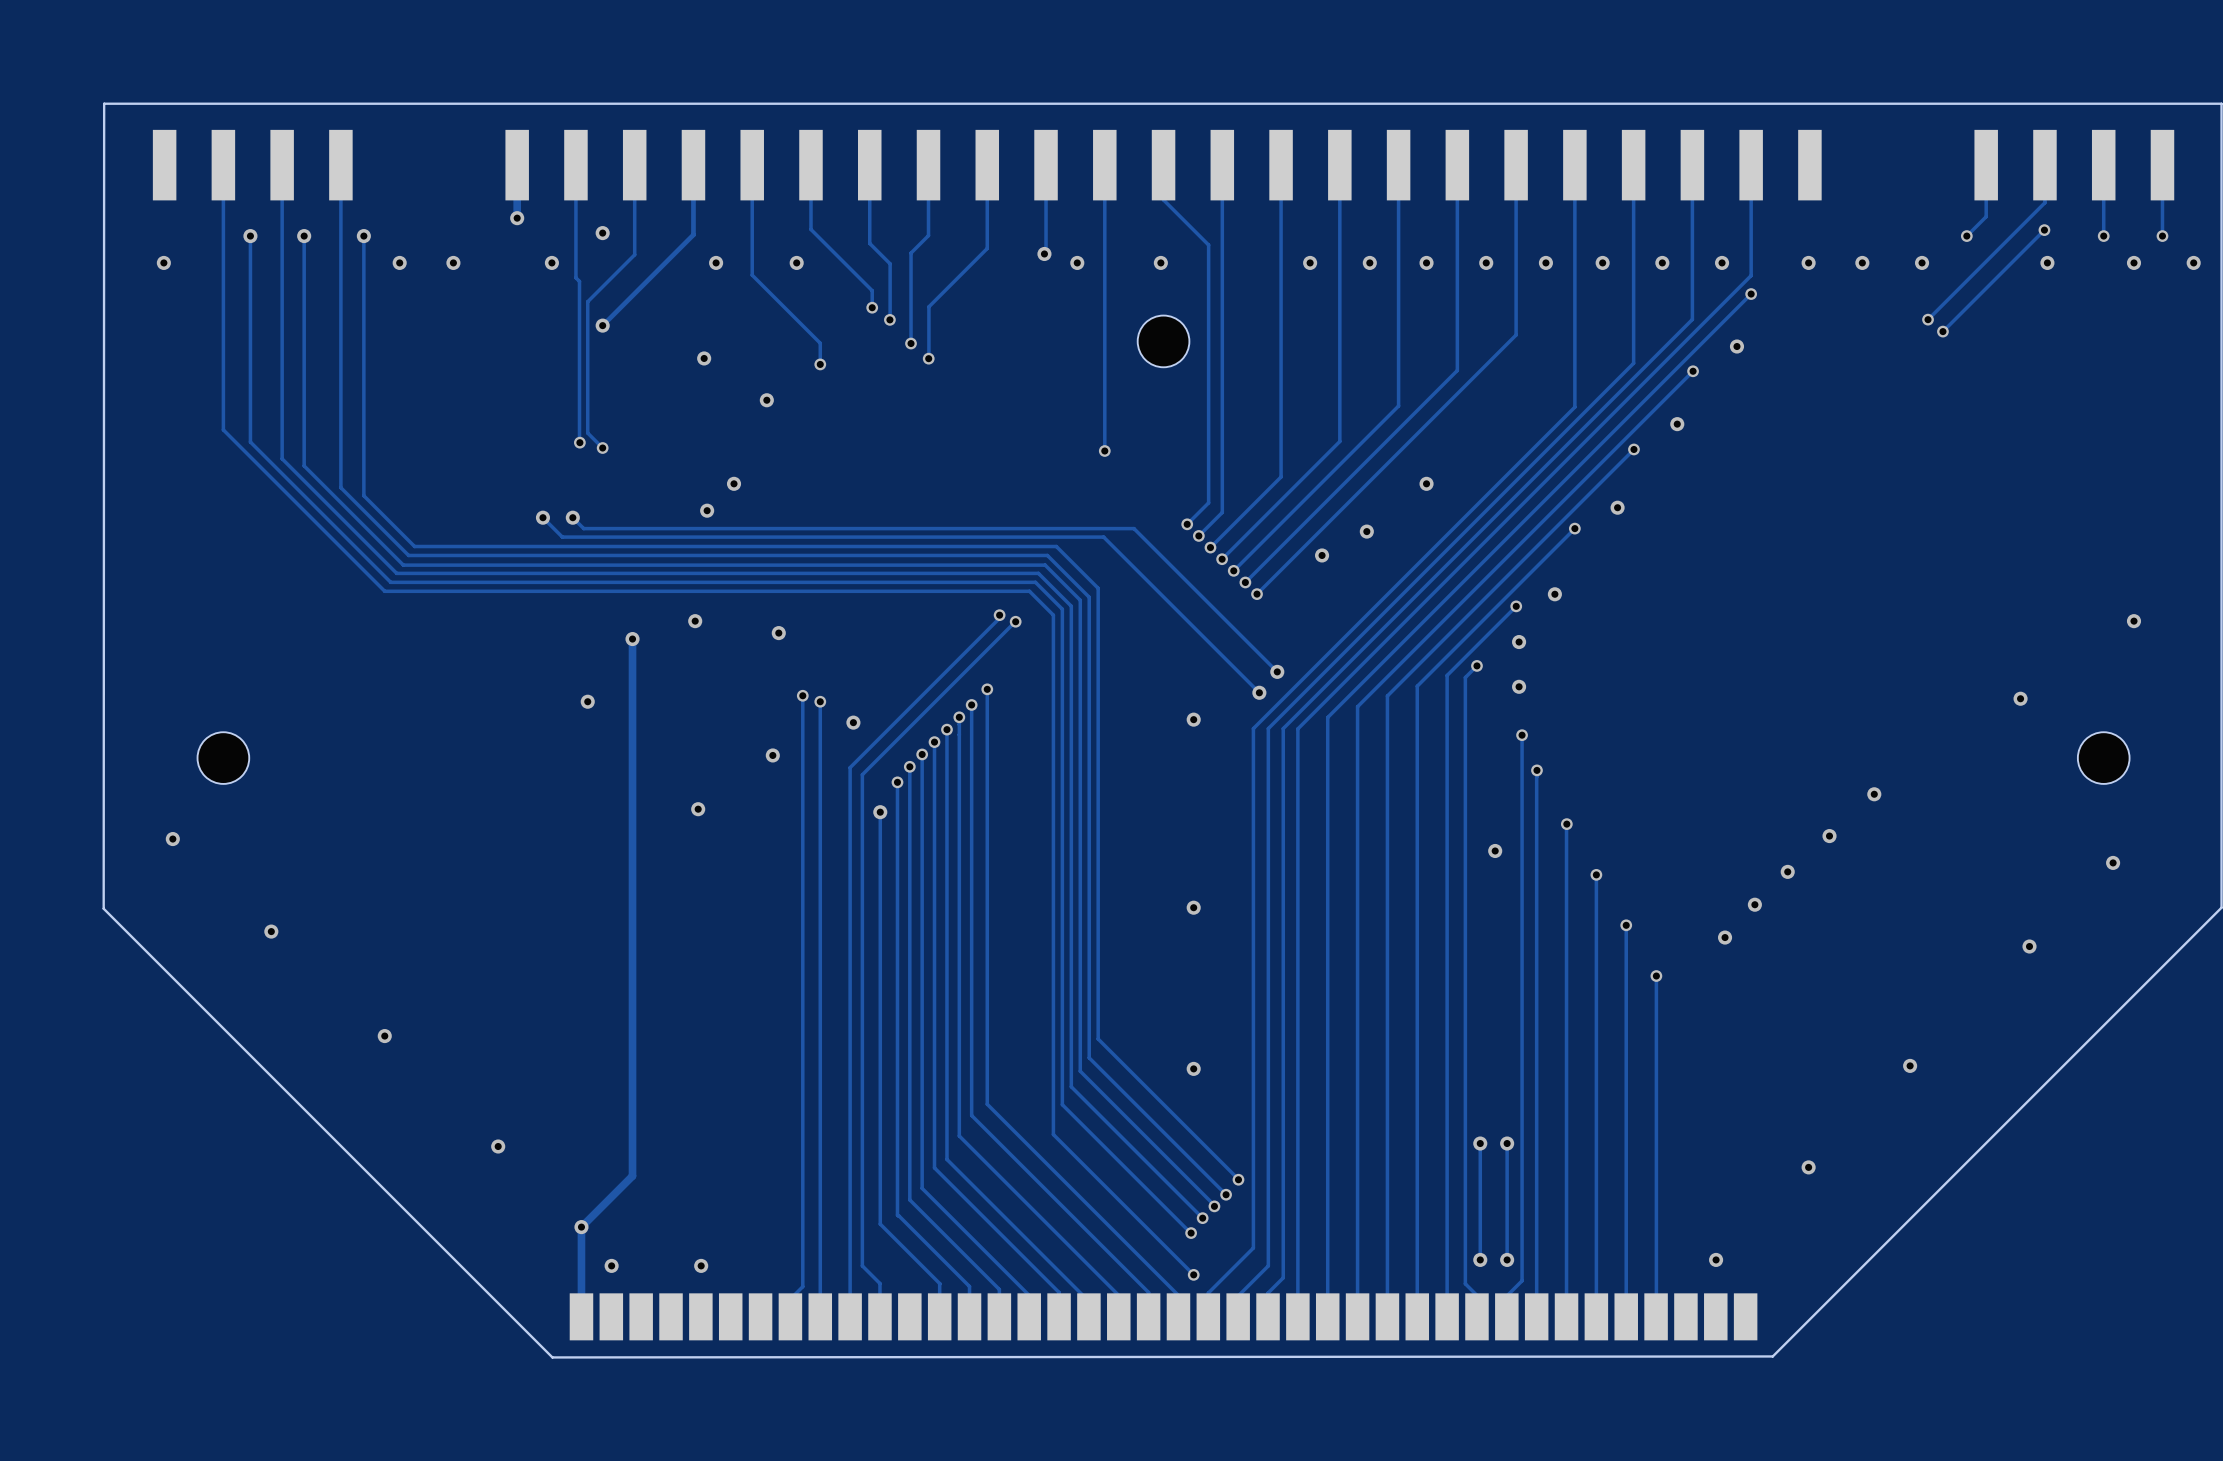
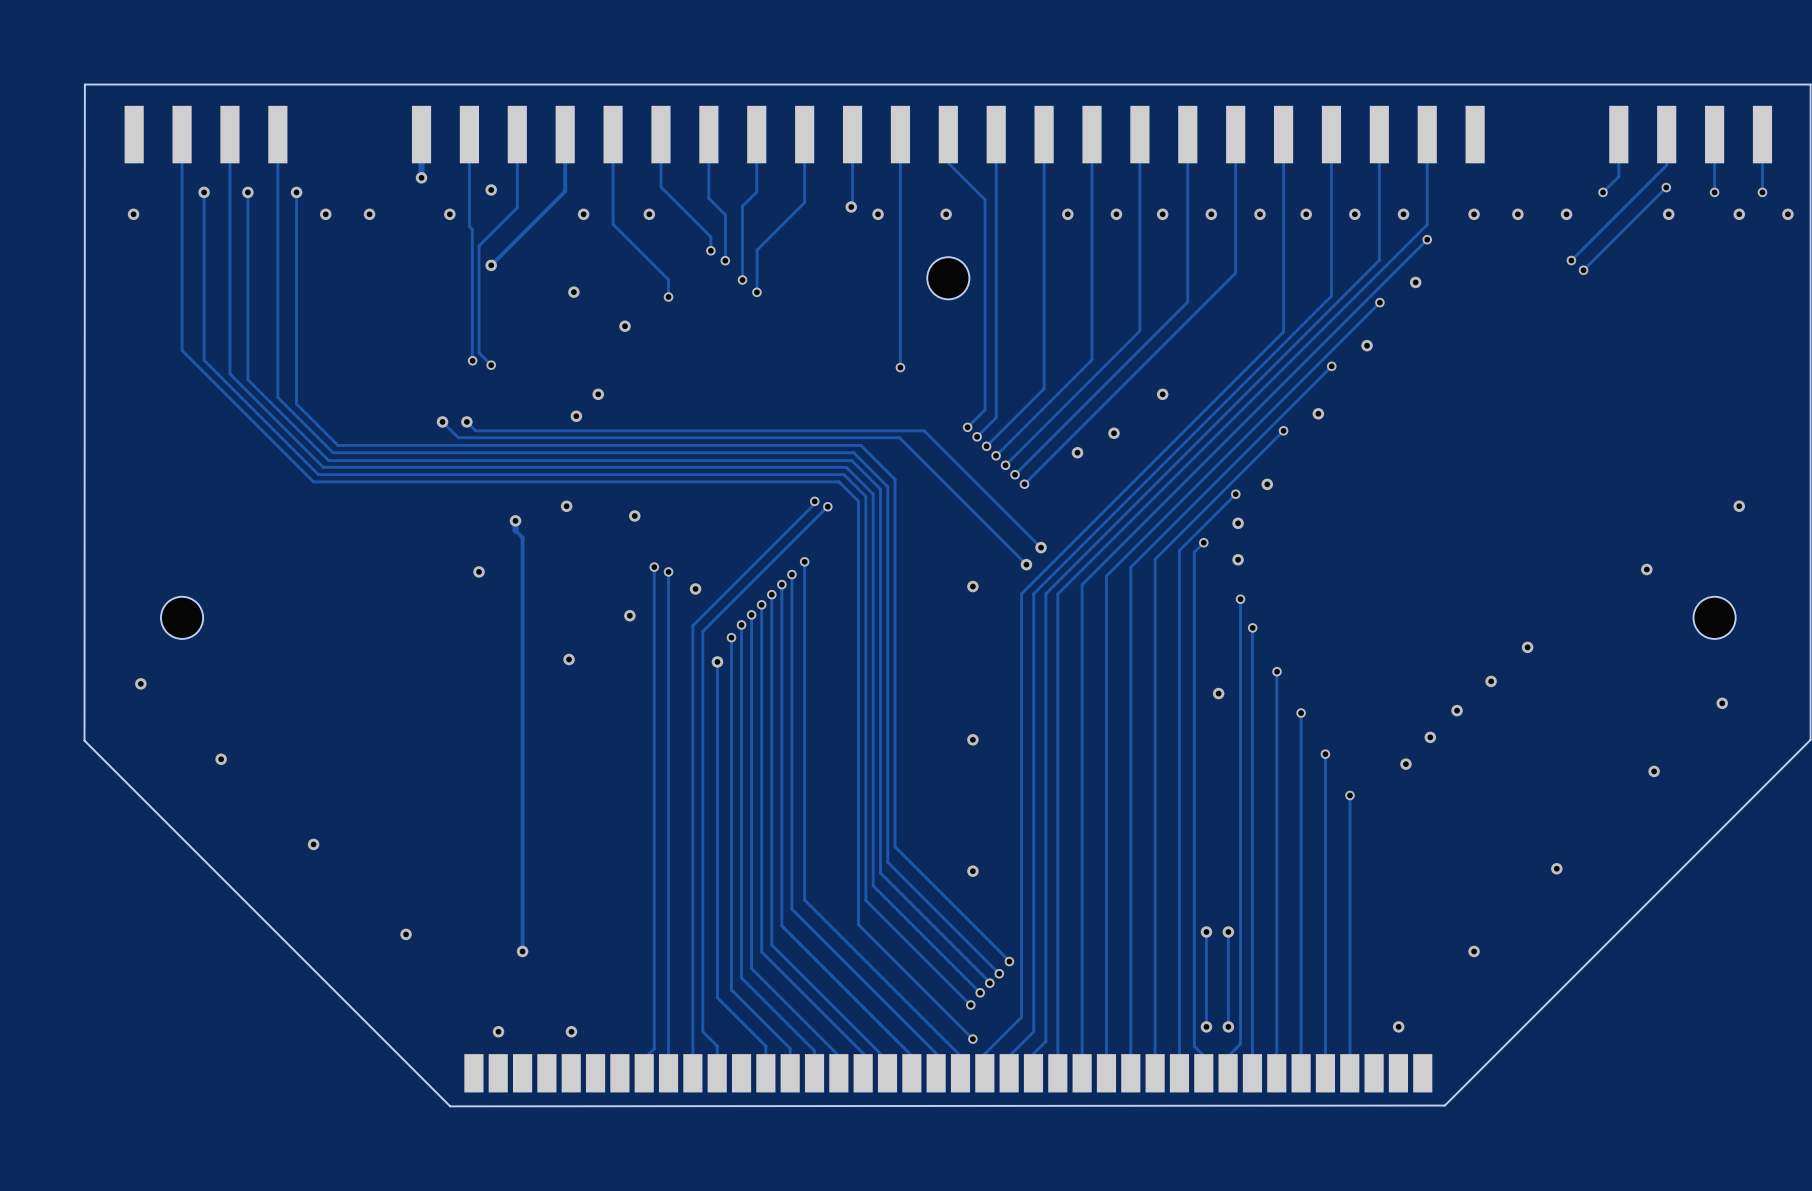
track: (632, 650) (632, 1176) (581, 1227) (581, 1316) -> (515, 530) (522, 537) (522, 951)
via position: (581, 1227) -> (522, 951)

